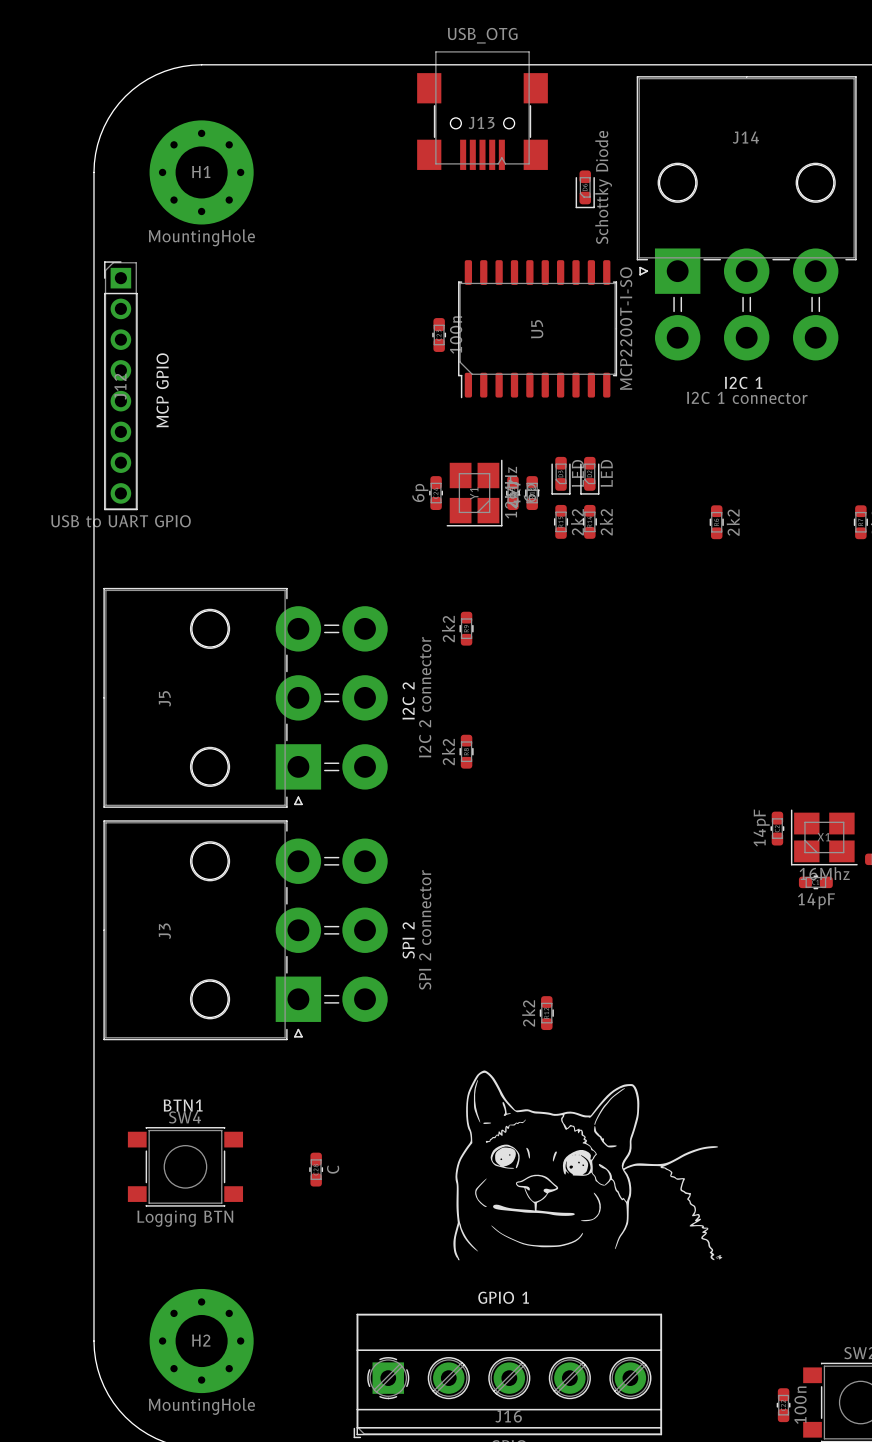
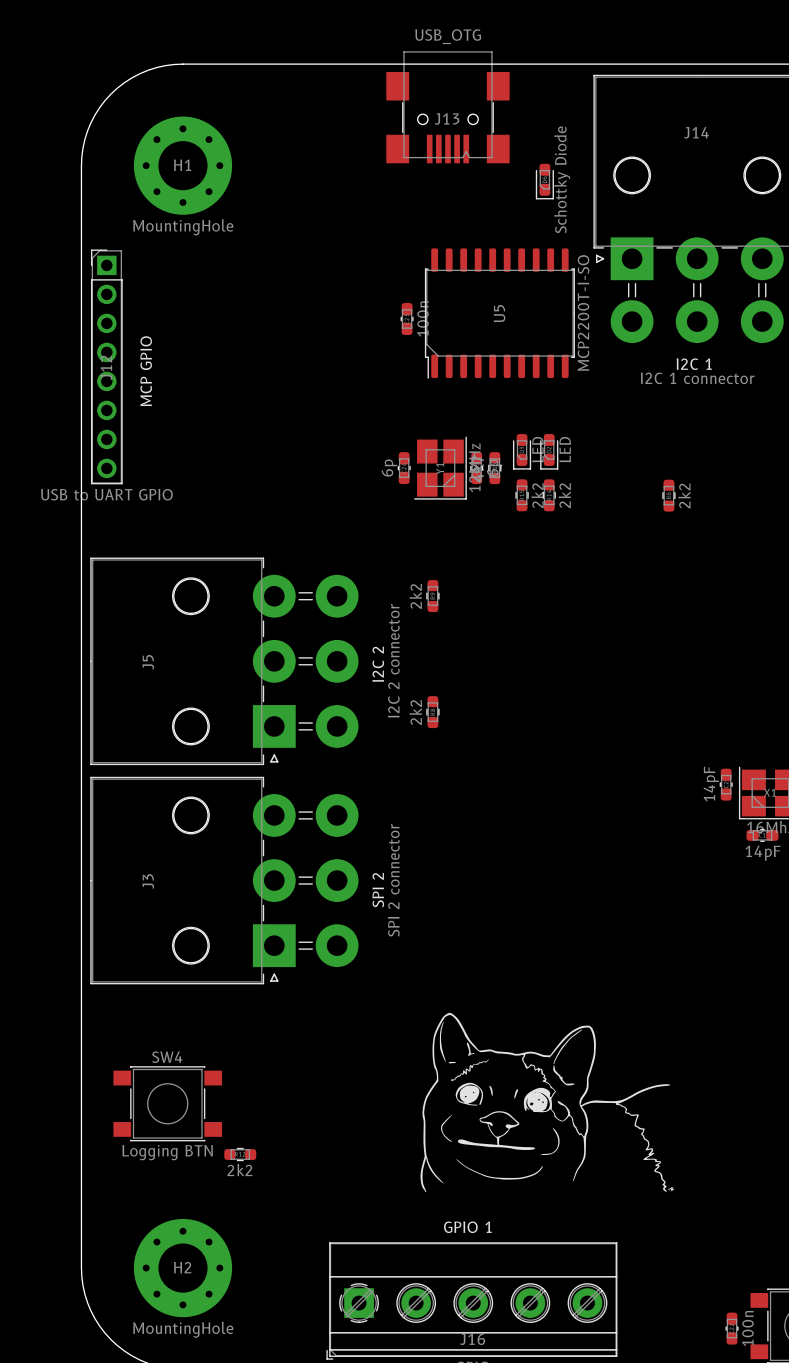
part value position: 2k2 (528, 1013) -> 2k2 (239, 1170)
part rotation: 0° (546, 1013) -> 90° clockwise (240, 1154)
part position: (546, 1013) -> (240, 1154)
text: BTN1 (183, 1105) -> none
part: C (316, 1169) -> none

